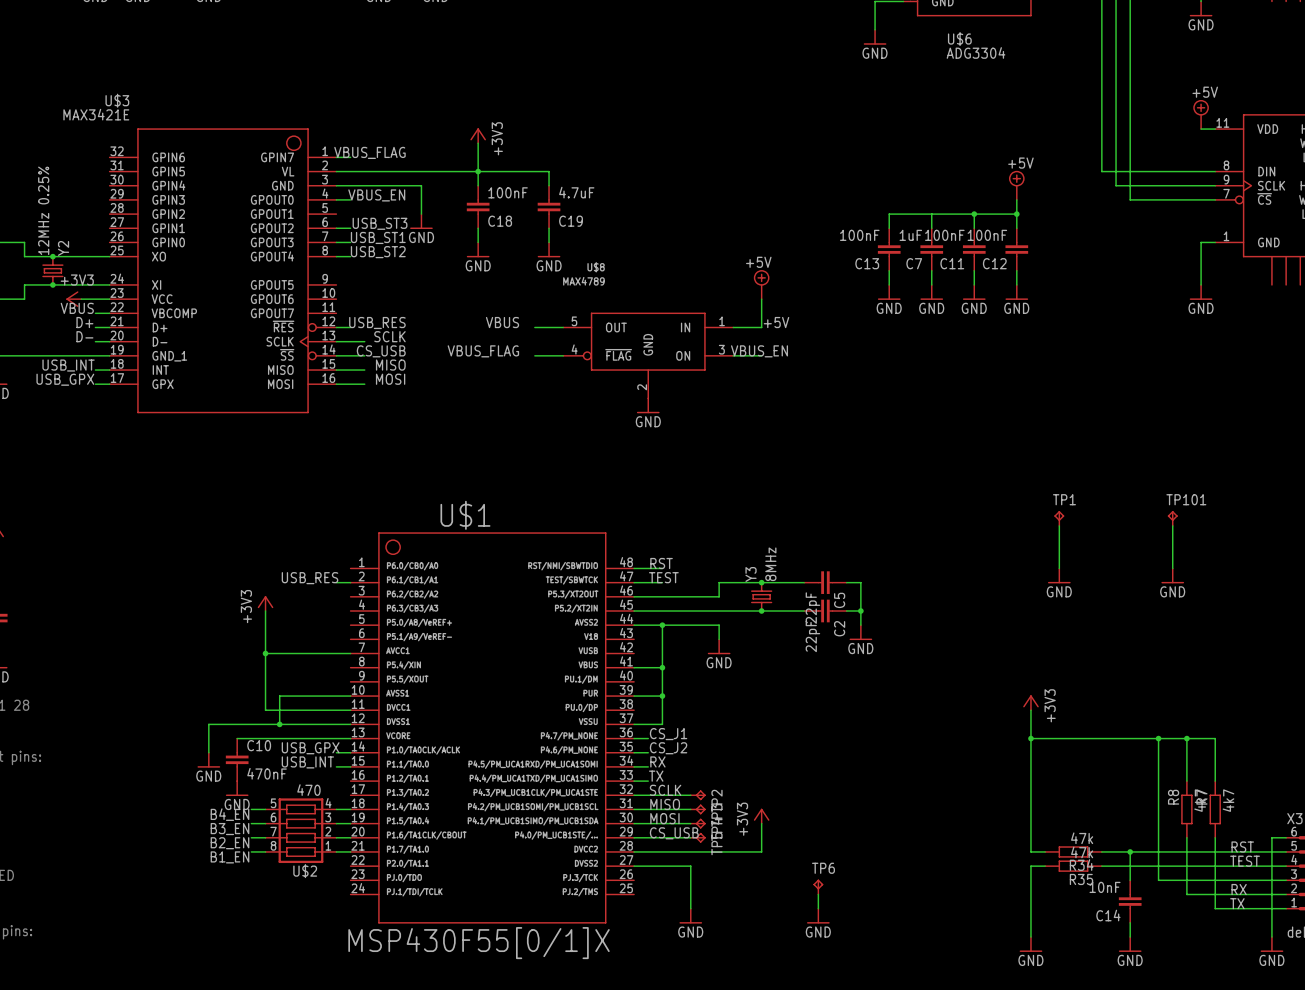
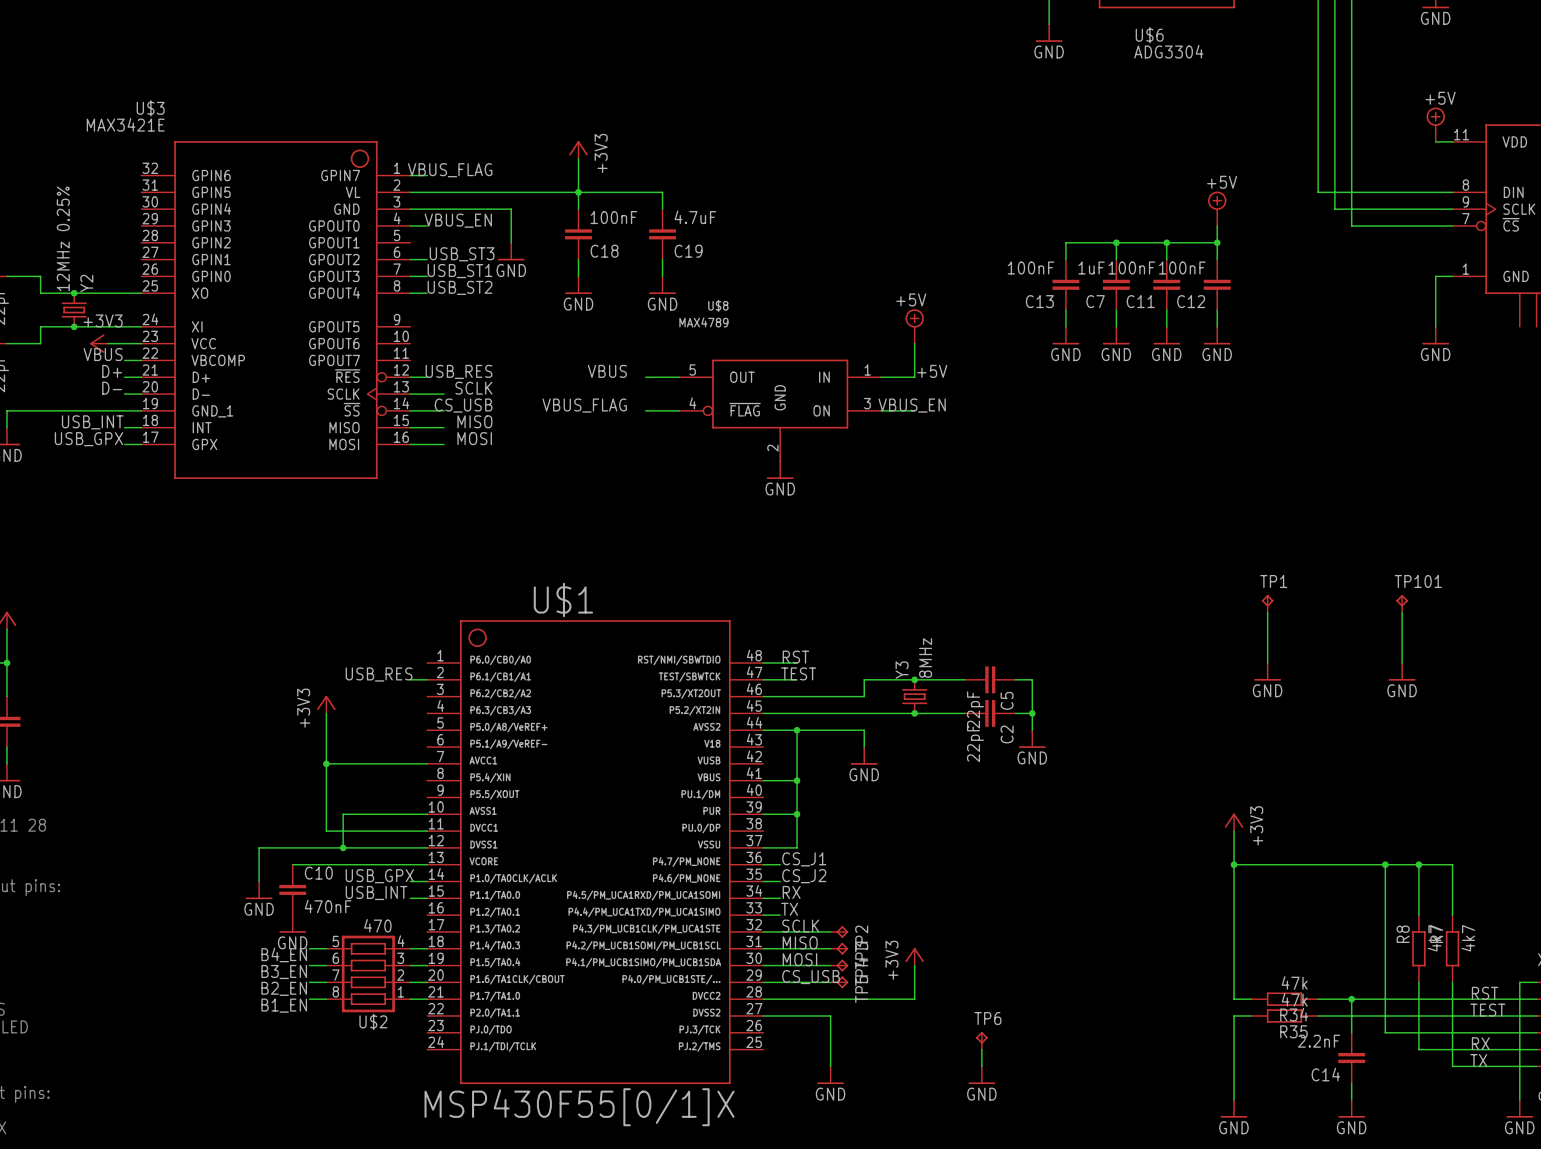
junction: none -> (1116, 242)
C14 value: 10nF (1105, 887) -> 2.2nF (1319, 1041)

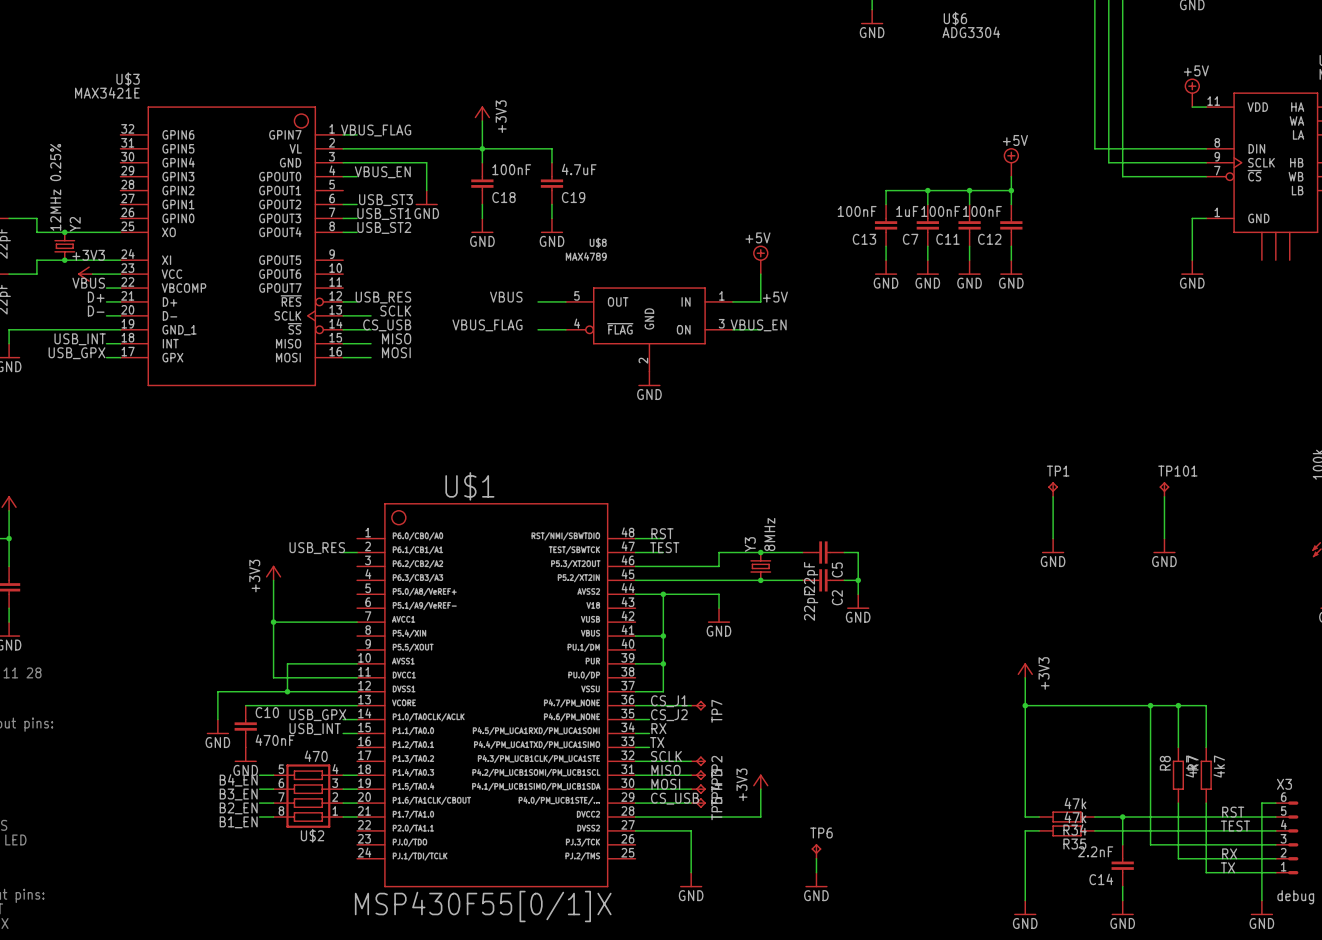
wire: none -> (649, 705) (691, 705)
TP7: none -> (698, 705)

